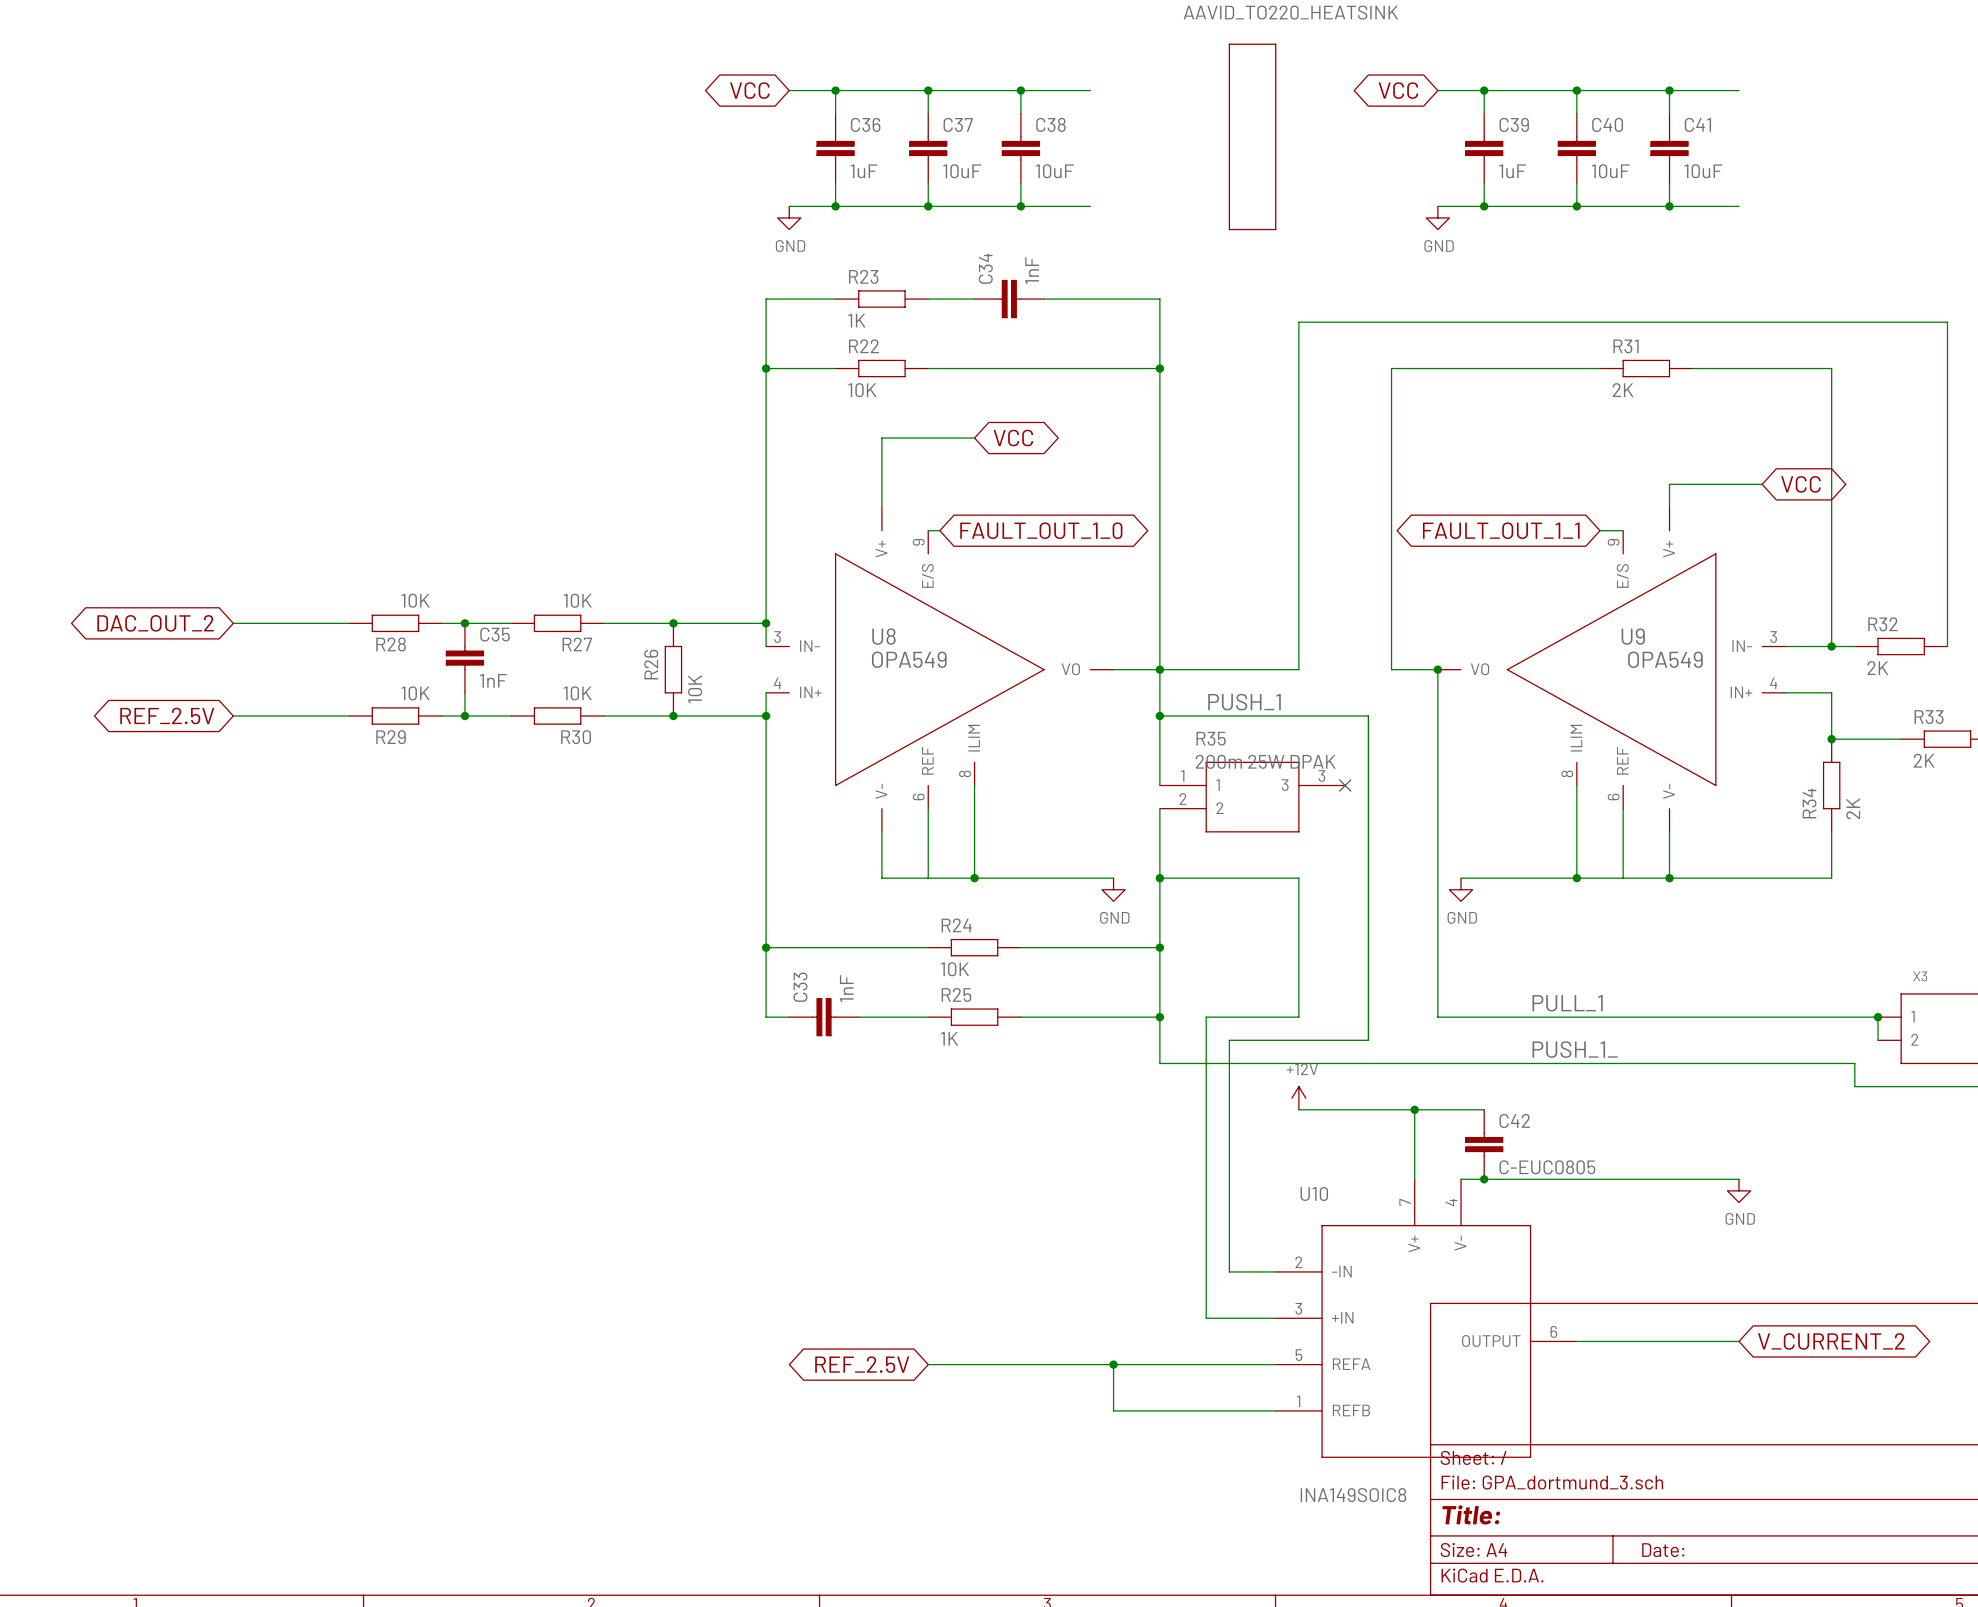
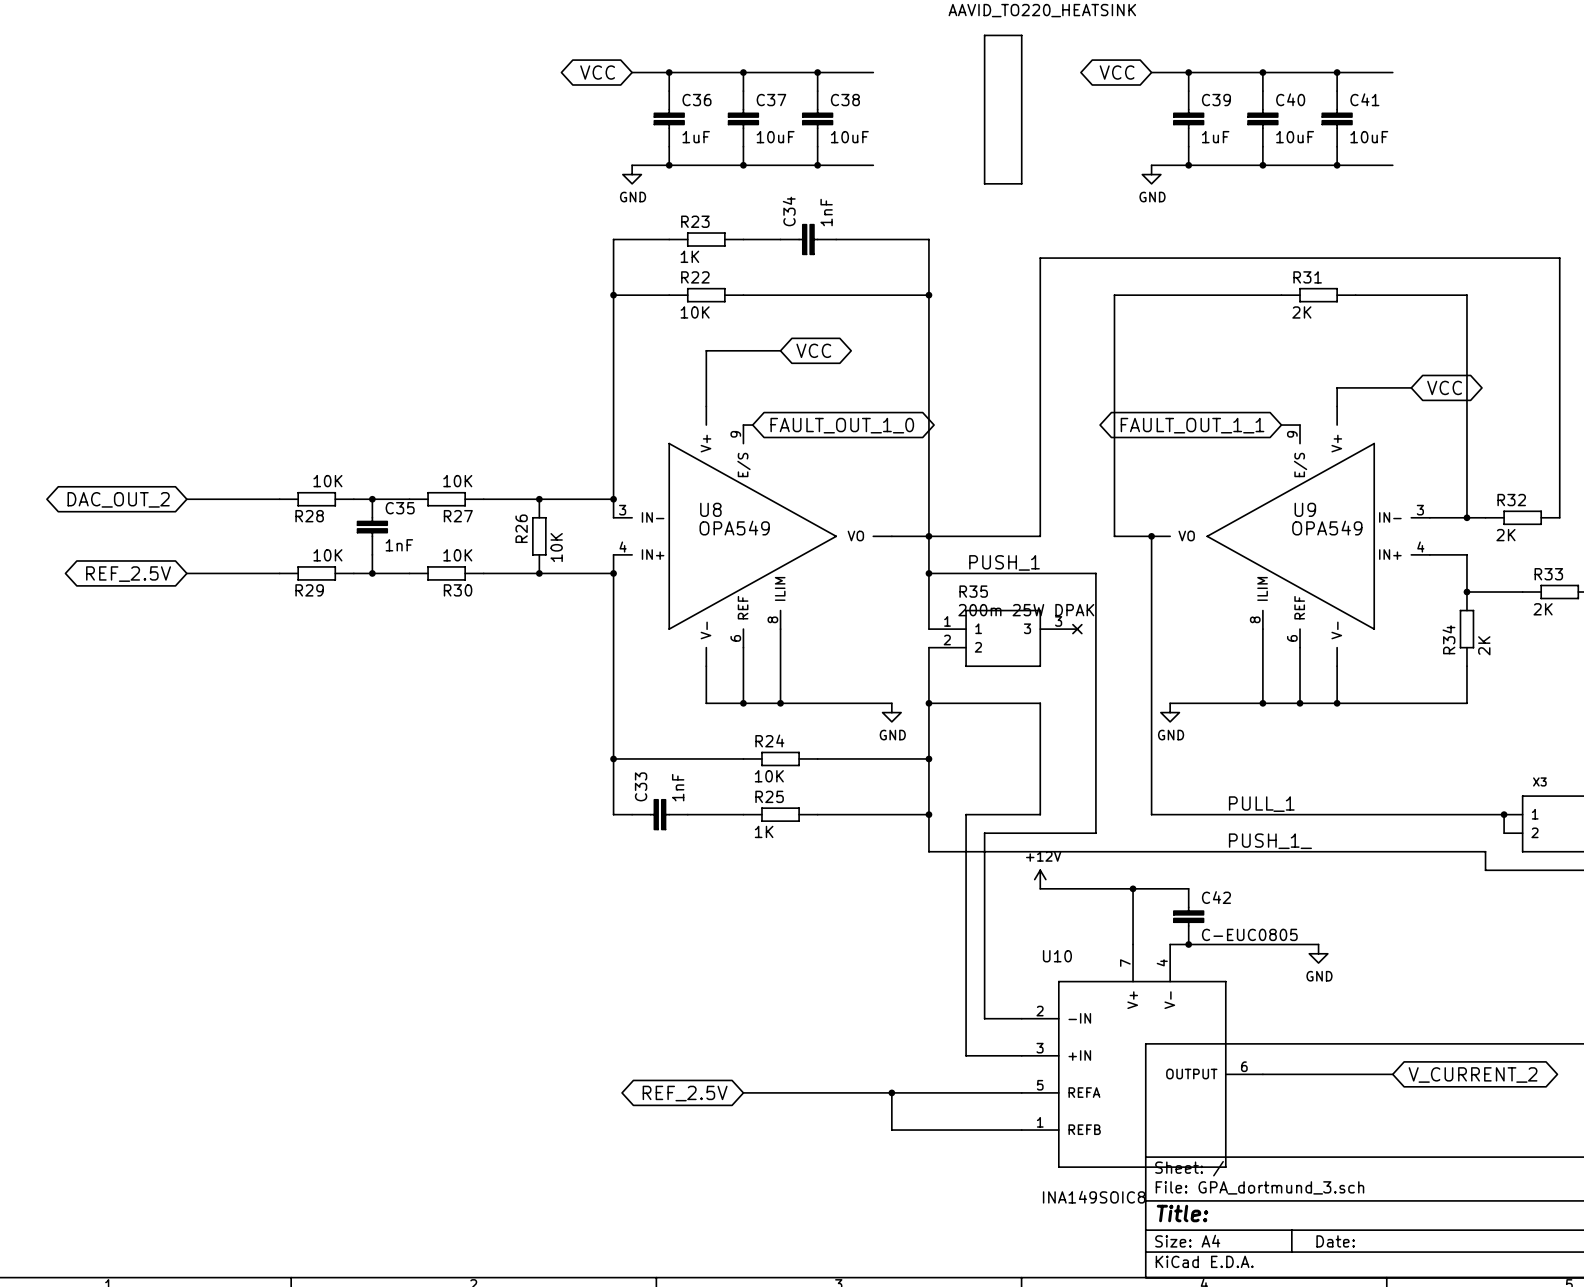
junction: none -> (743, 703)
junction: none -> (1300, 703)
wire: (1646, 1179) (1739, 1179) -> none
power symbol position: GND (1739, 1190) -> GND (1318, 953)

